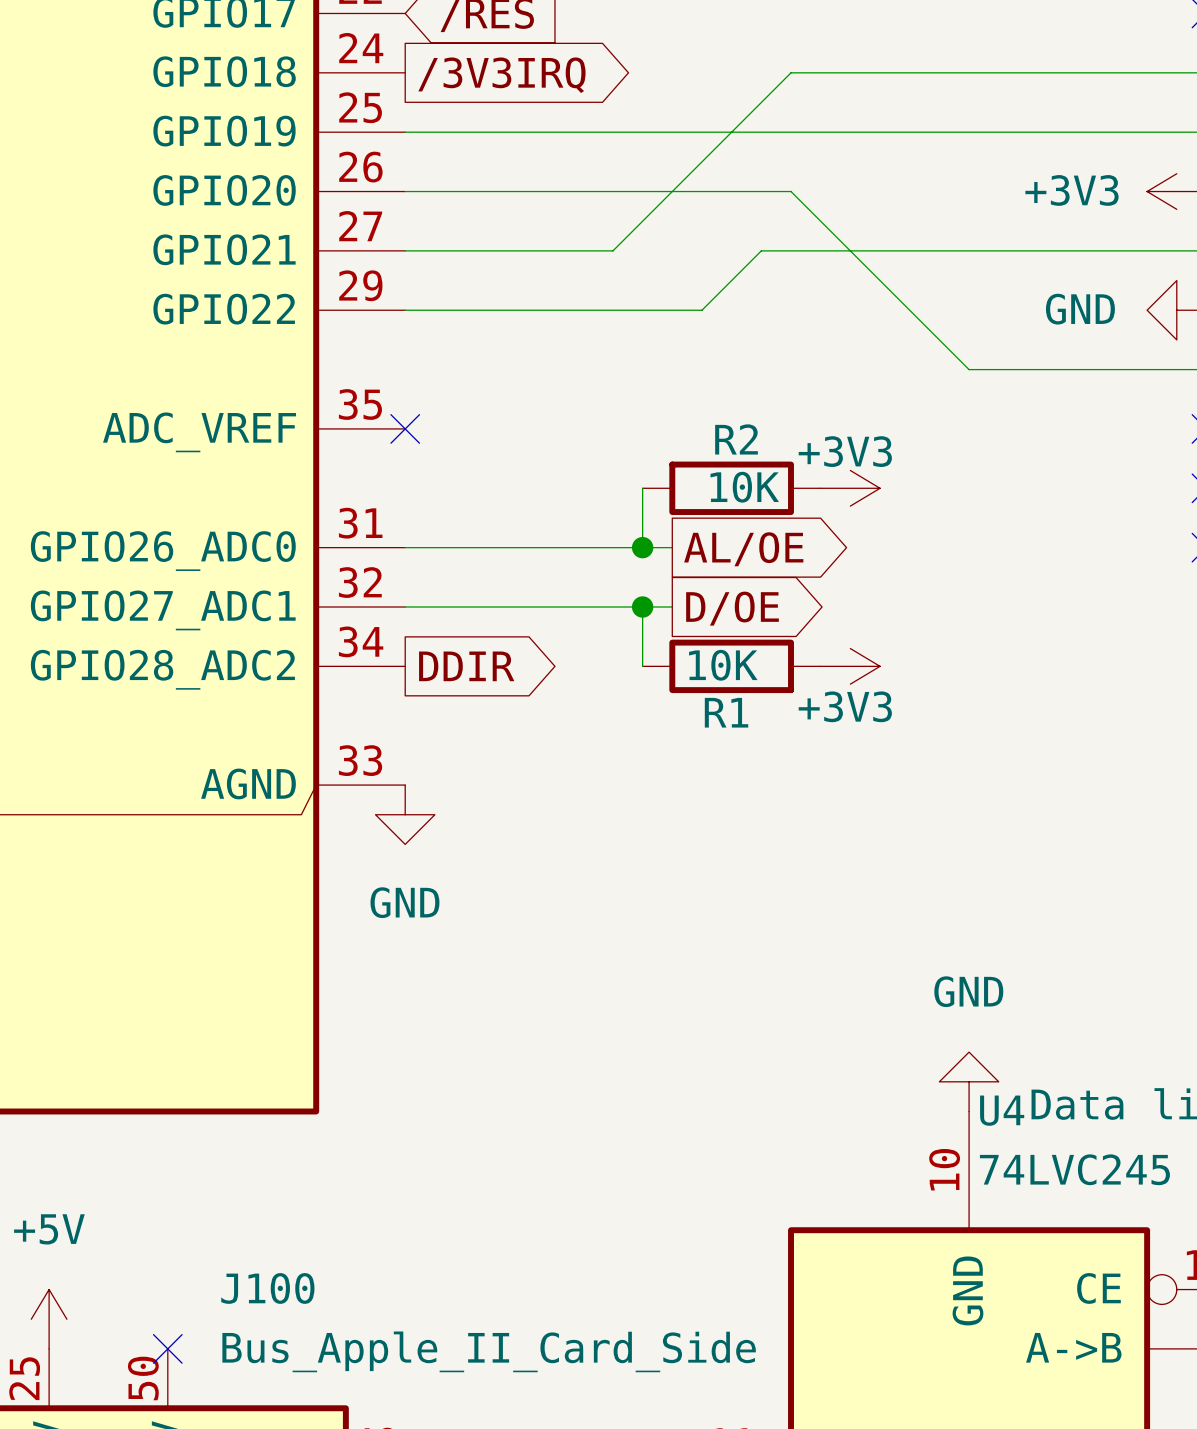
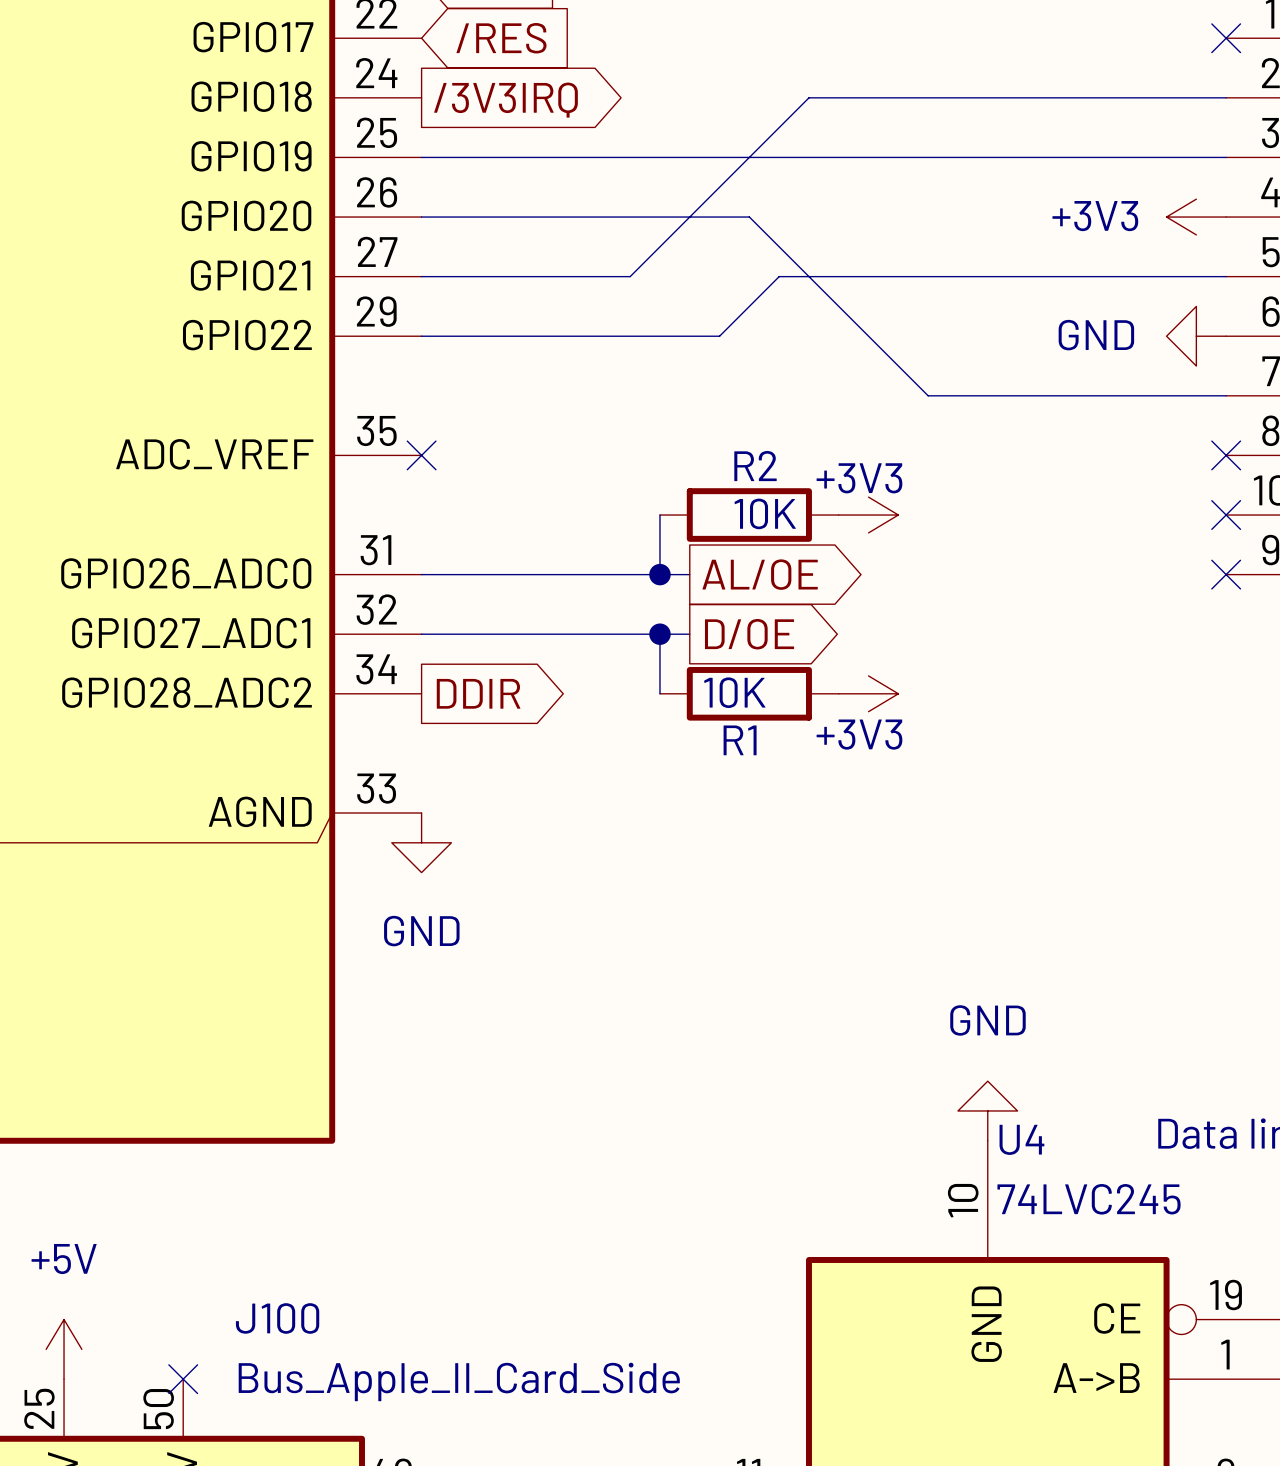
wire: (731, 191) (791, 191) (969, 369) -> (749, 217) (928, 395) (987, 395)

